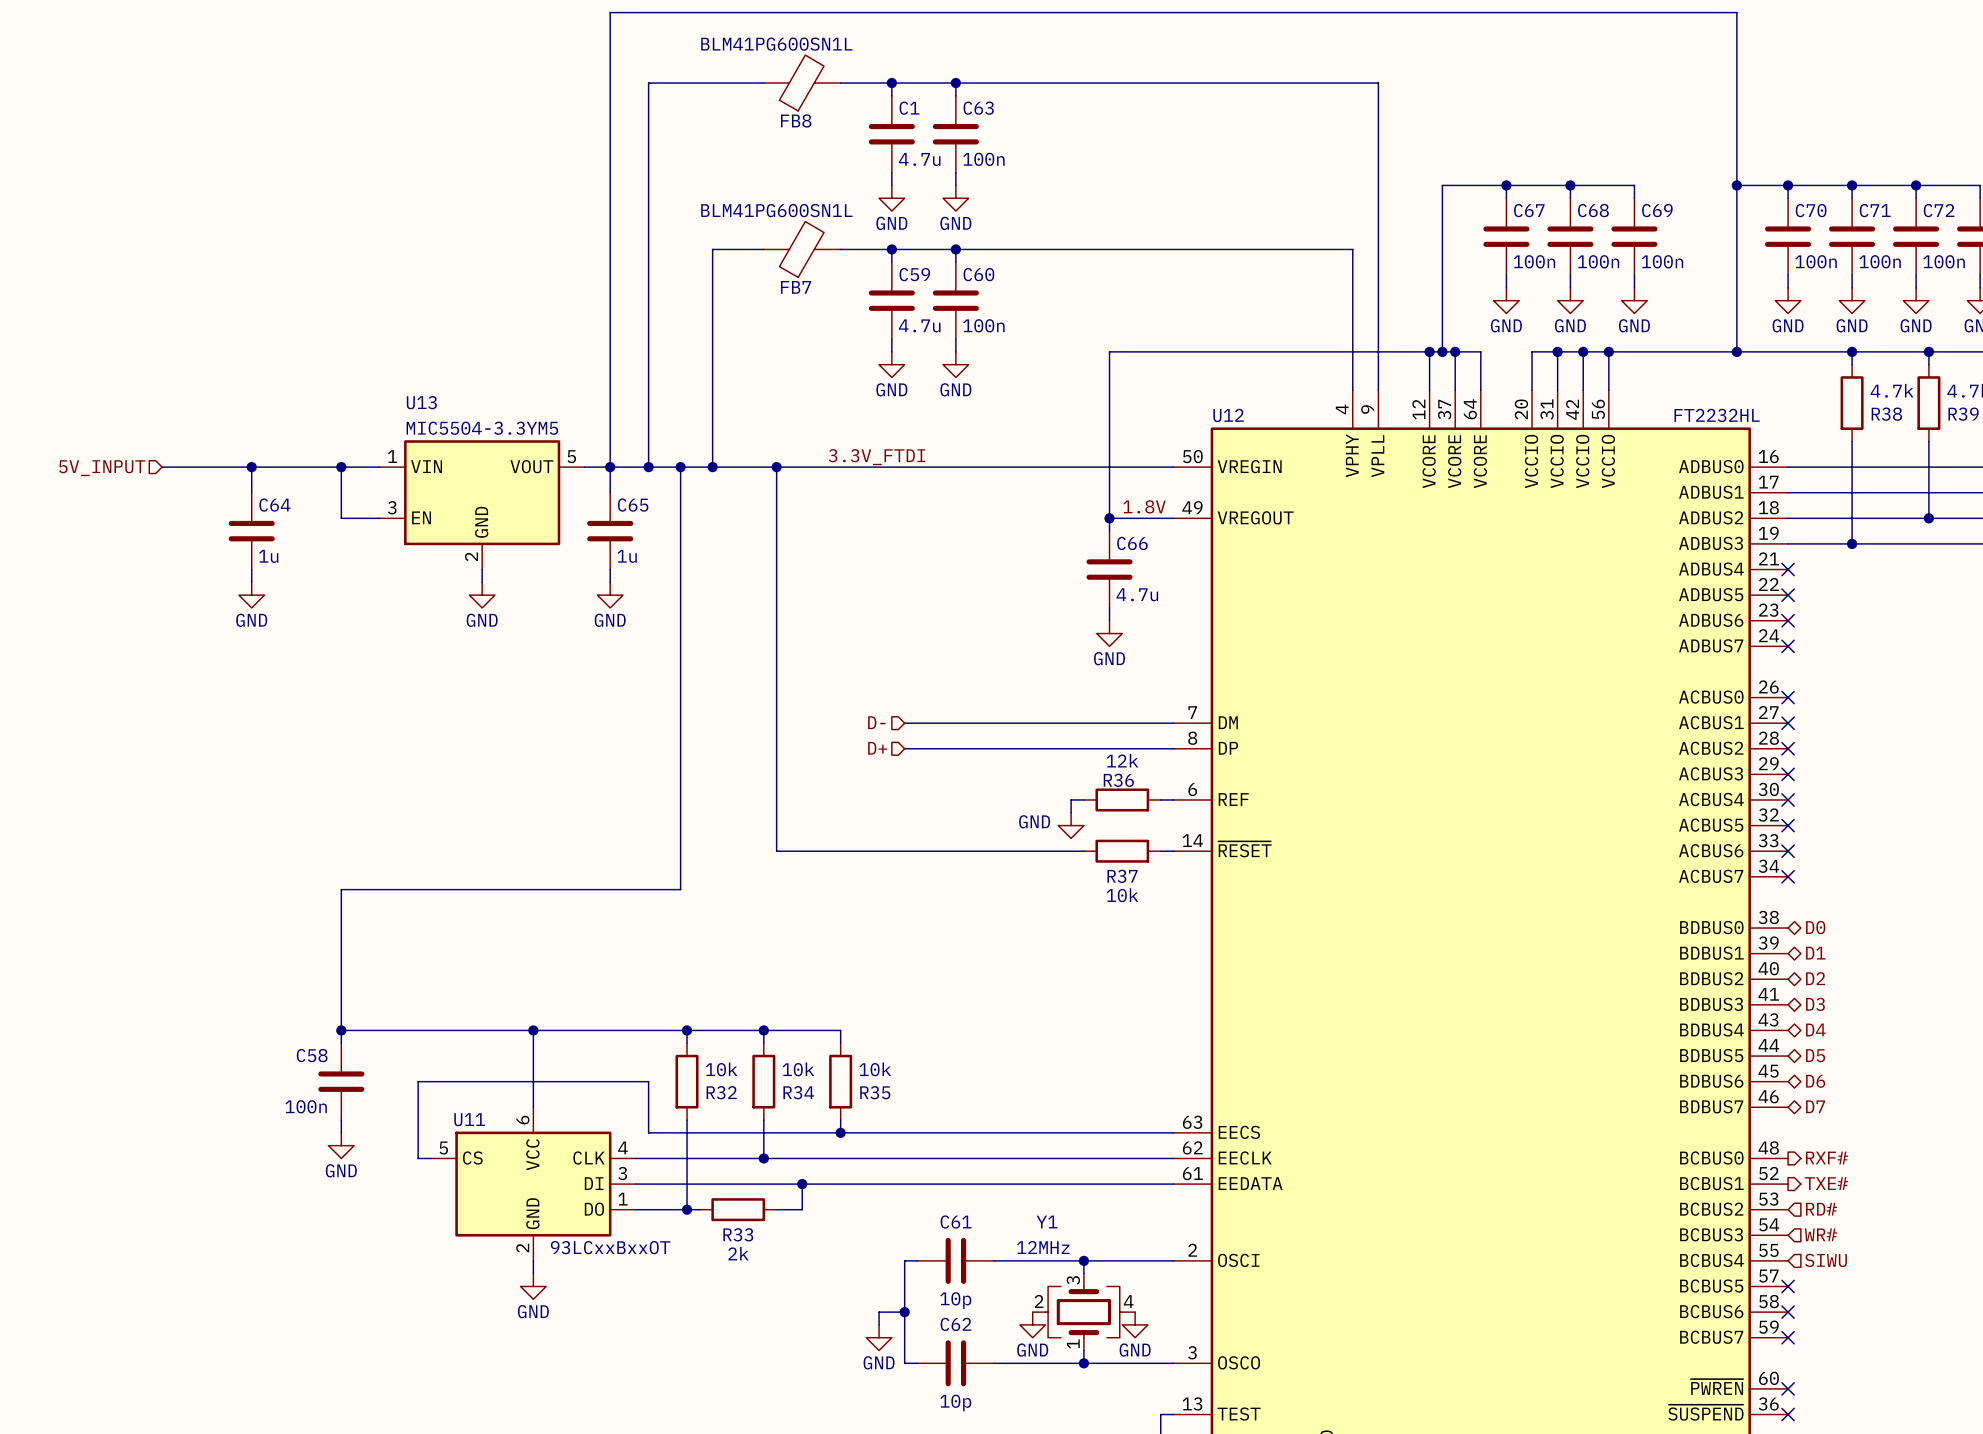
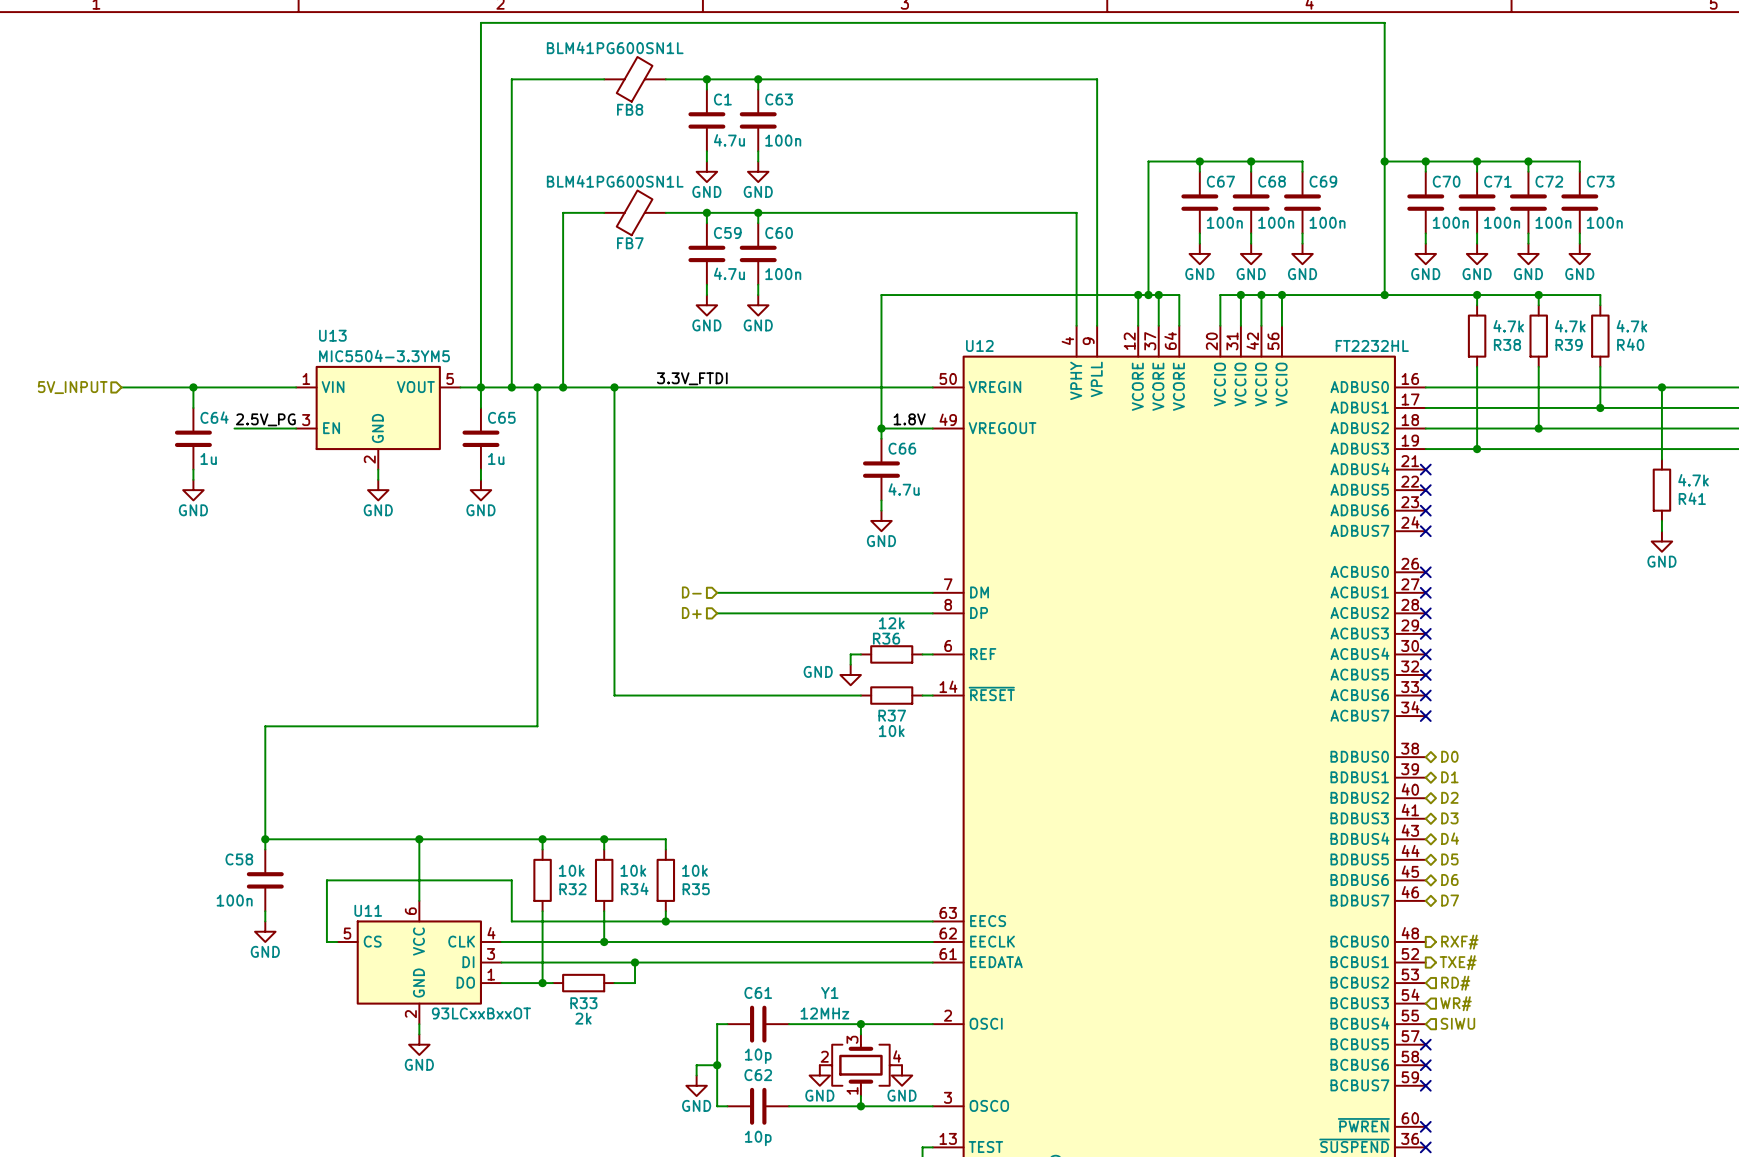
wire: (341, 467) (341, 518) -> (234, 428) (265, 428)
junction: (341, 467) -> none
label: none -> 2.5V_PG (265, 419)

